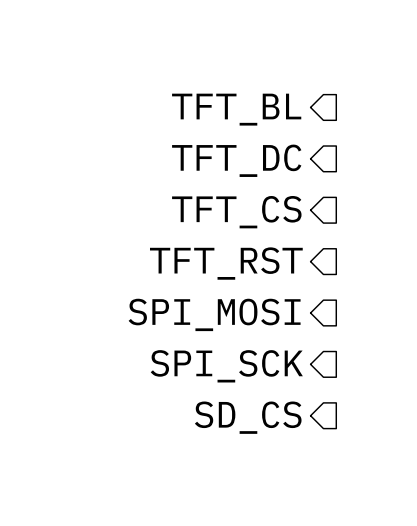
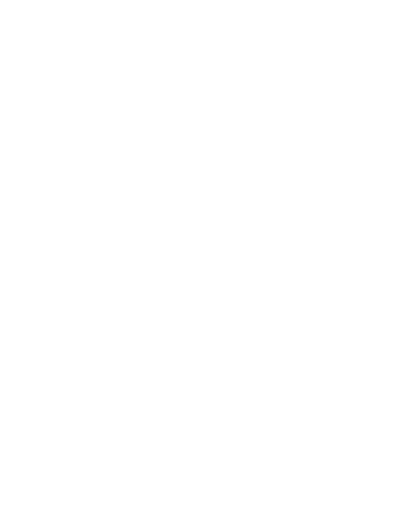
hierarchical label: TFT_BL (236, 109) -> none
hierarchical label: TFT_DC (236, 160) -> none
hierarchical label: TFT_CS (236, 212) -> none
hierarchical label: TFT_RST (226, 263) -> none
hierarchical label: SPI_MOSI (214, 314) -> none
hierarchical label: SPI_SCK (226, 366) -> none
hierarchical label: SD_CS (248, 417) -> none

